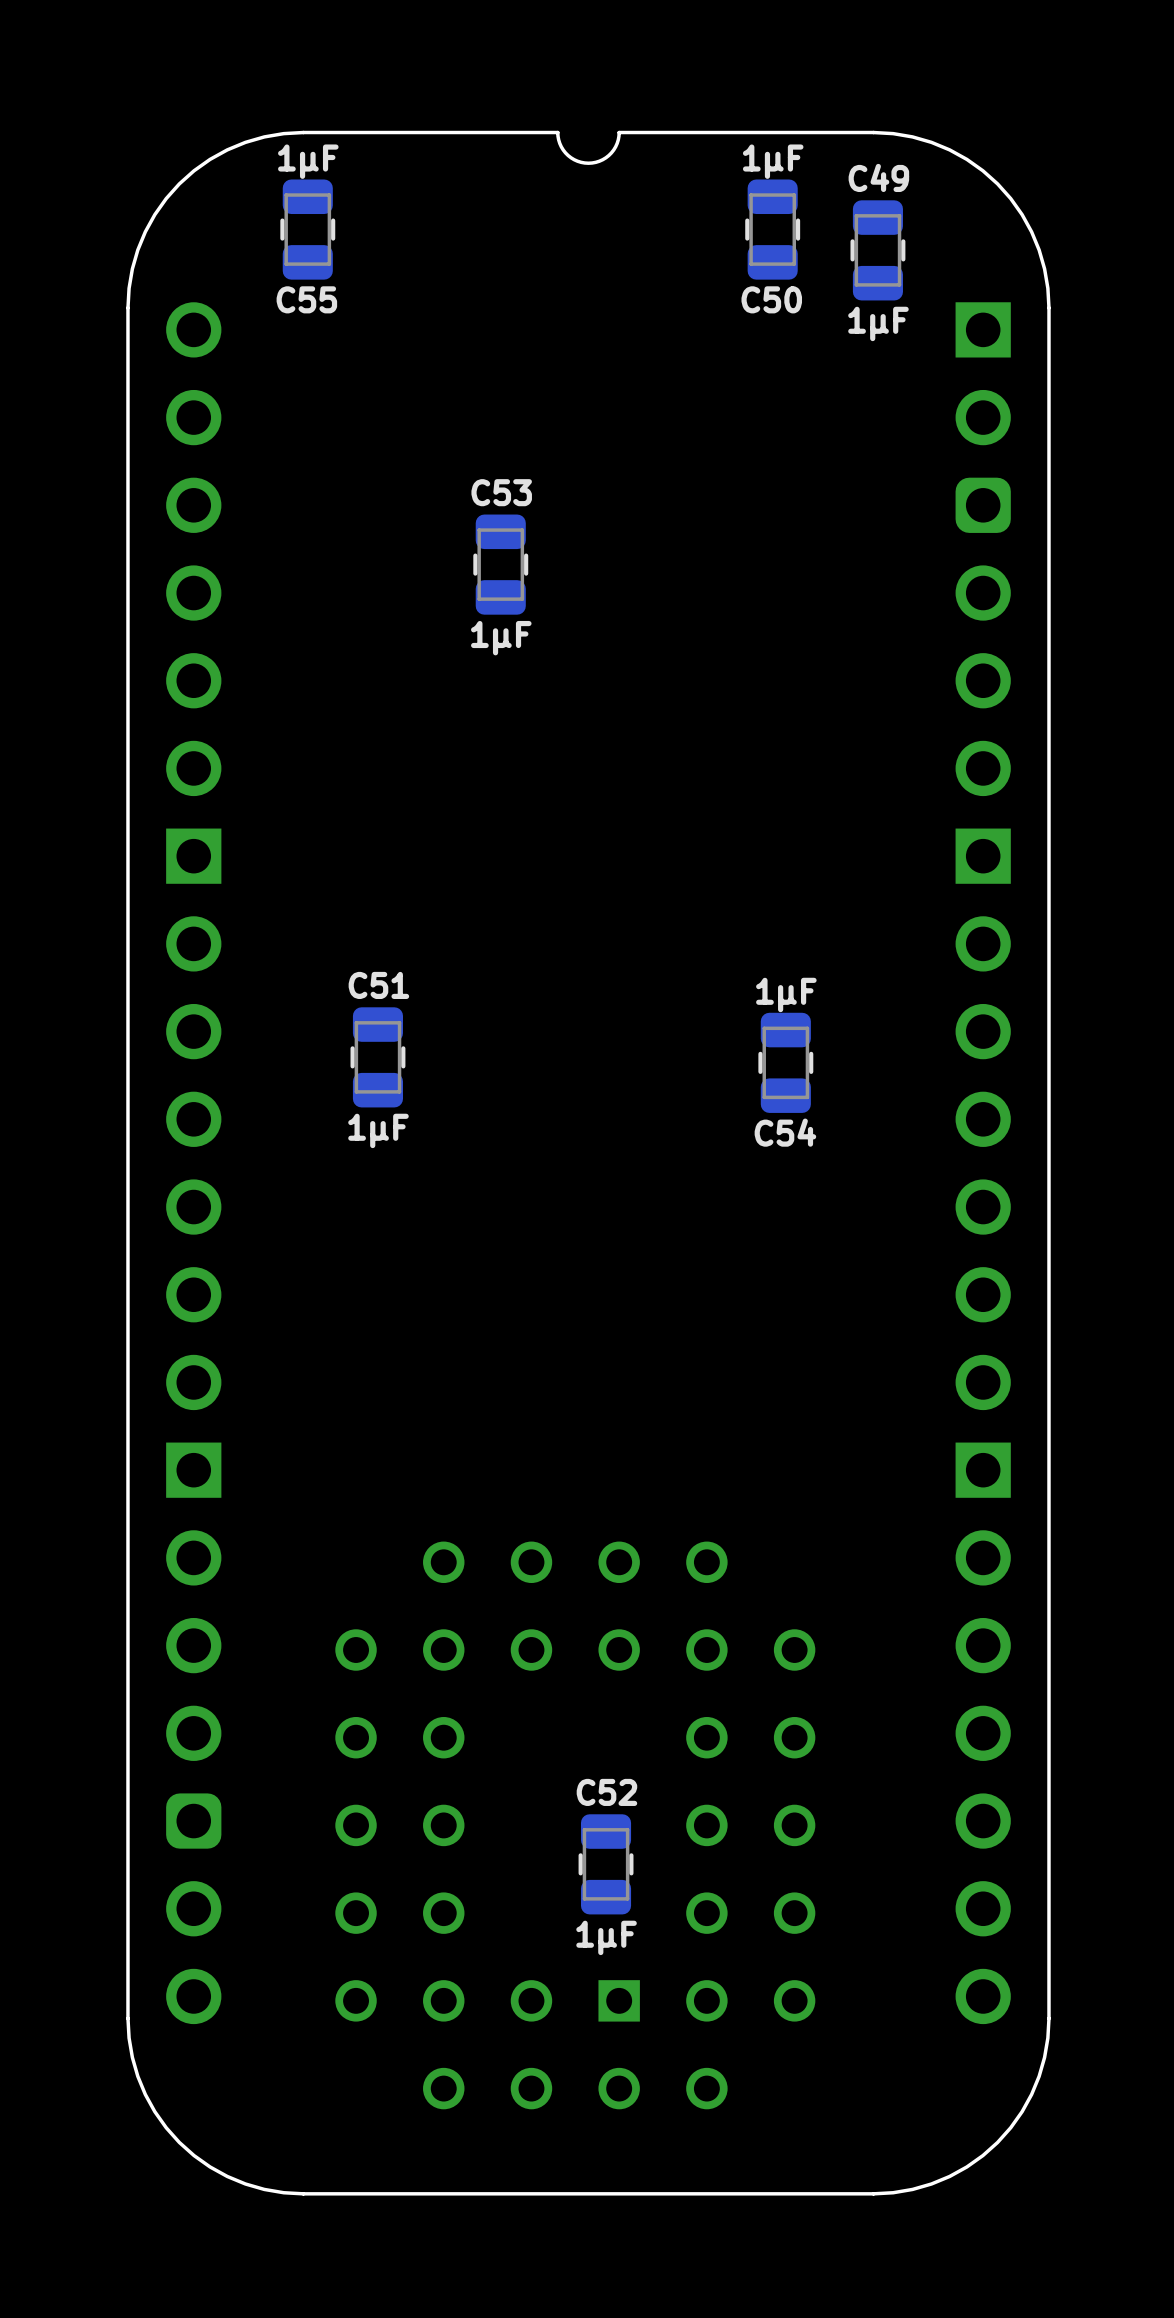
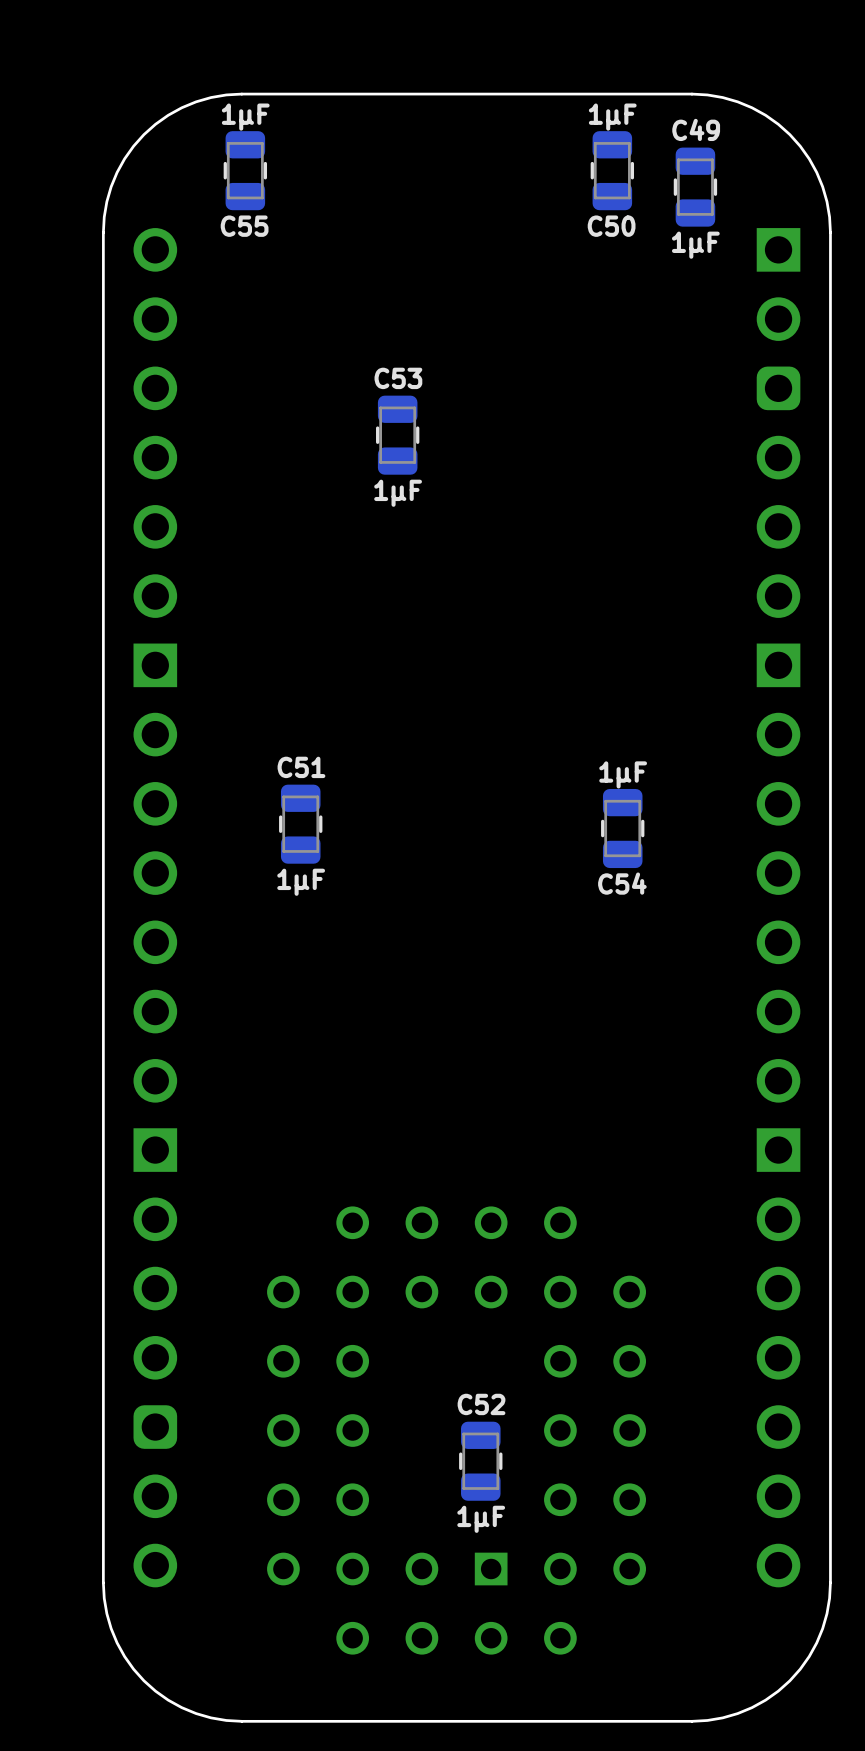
part footprint: [126, 130, 1051, 2196] -> [102, 92, 832, 1723]

